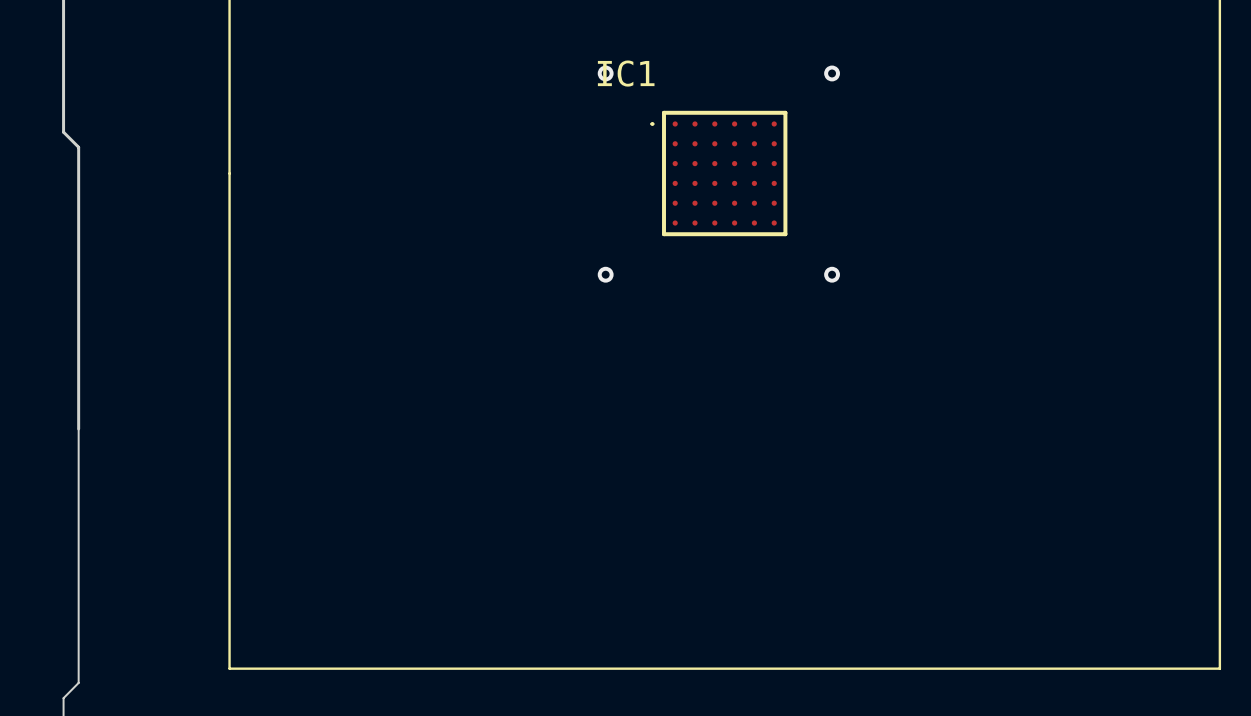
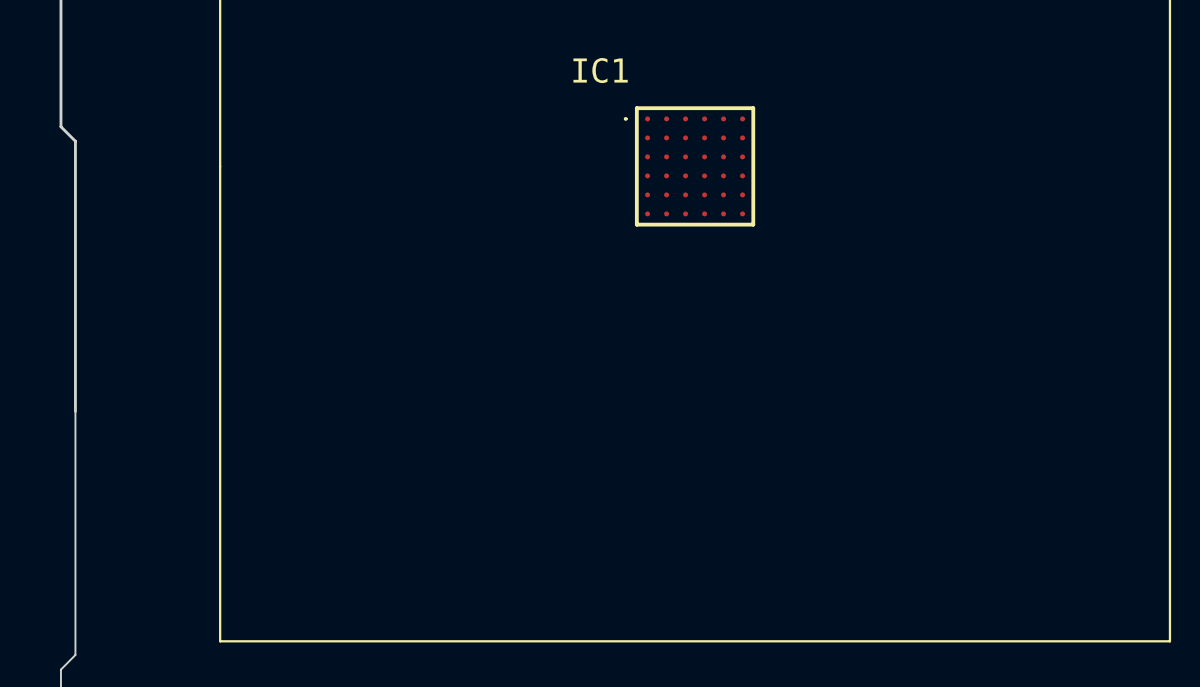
via: (605, 73) -> none
via: (832, 73) -> none
via: (605, 274) -> none
via: (832, 274) -> none

